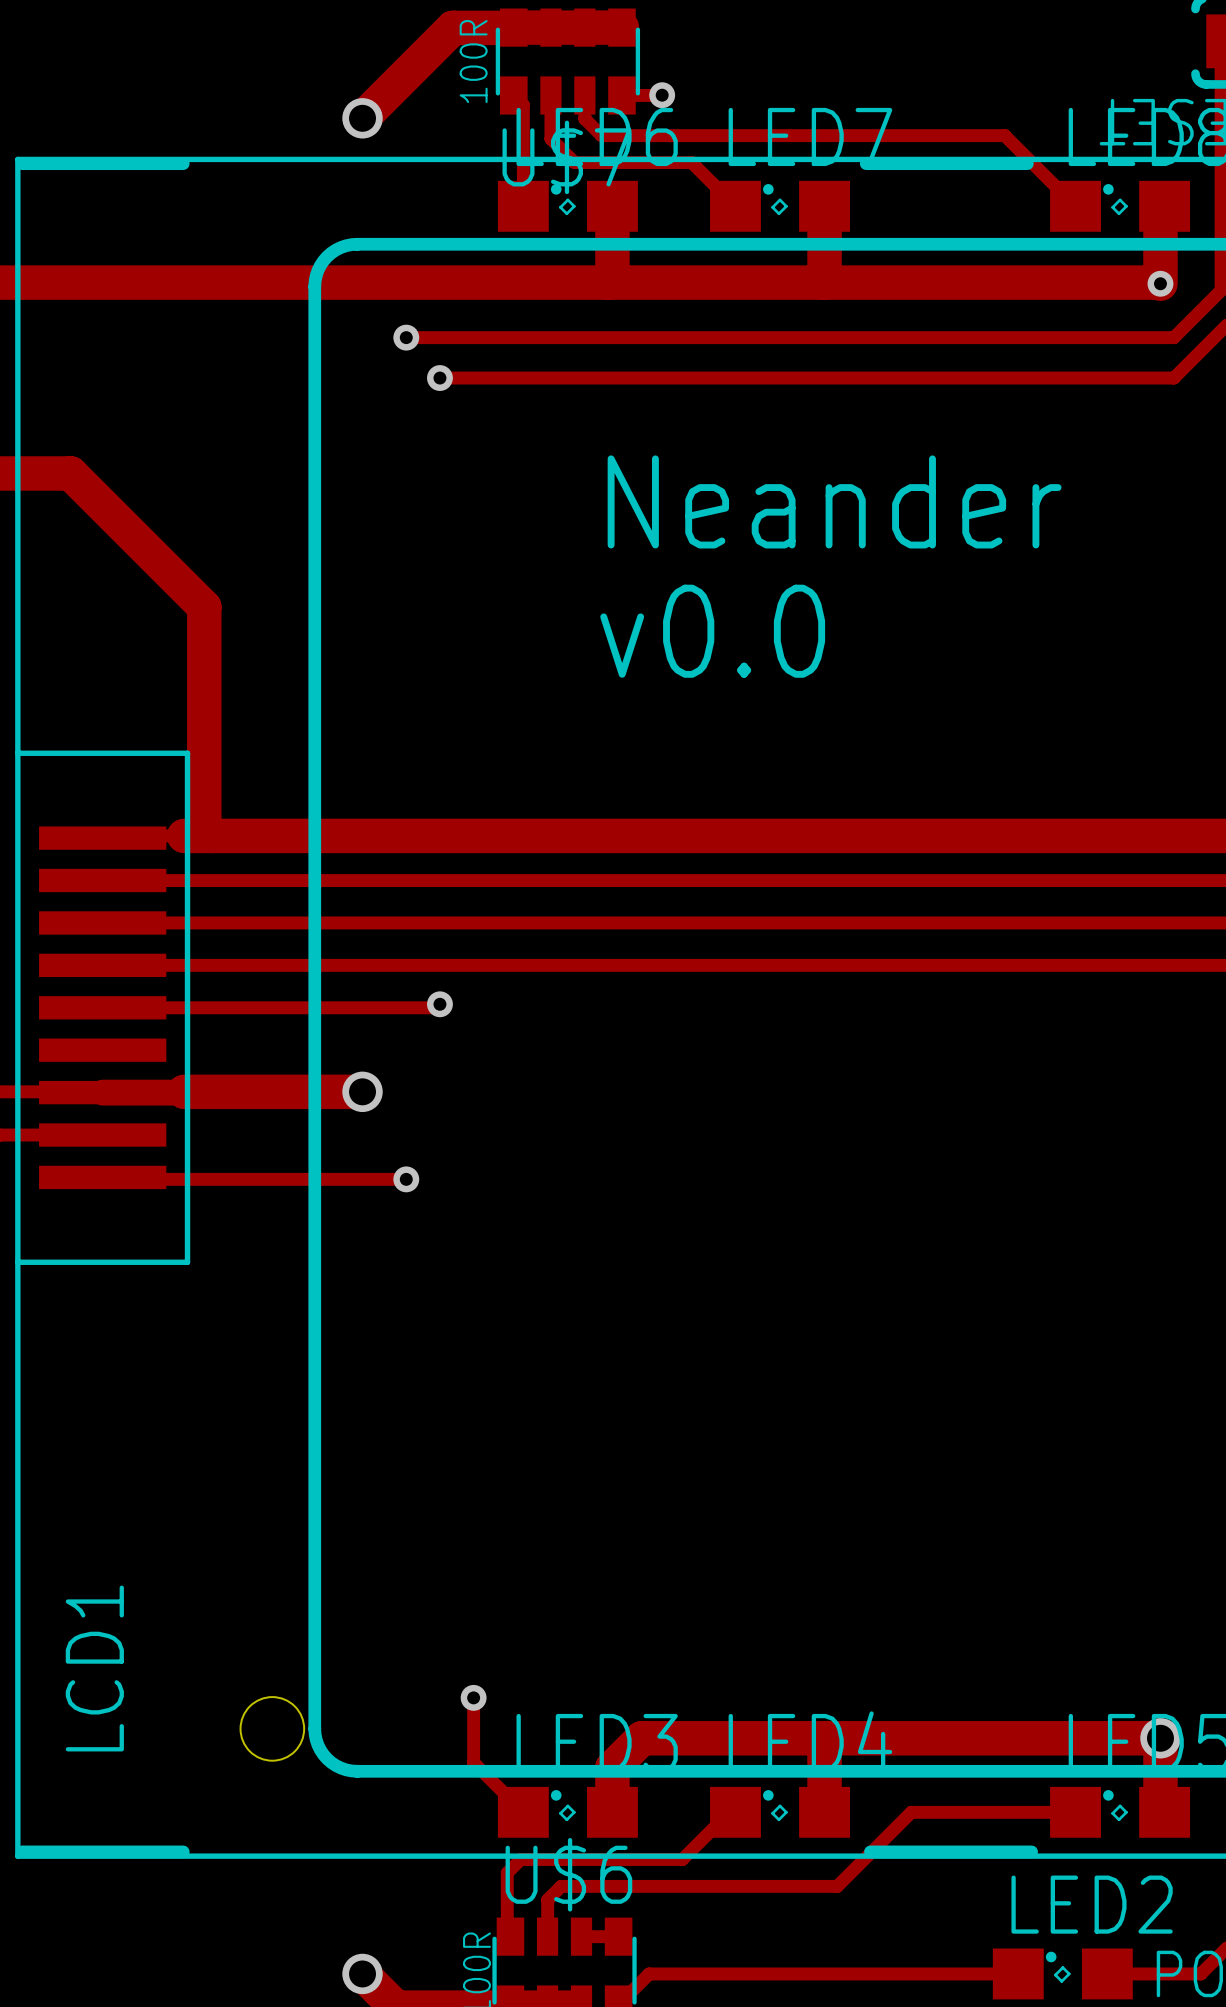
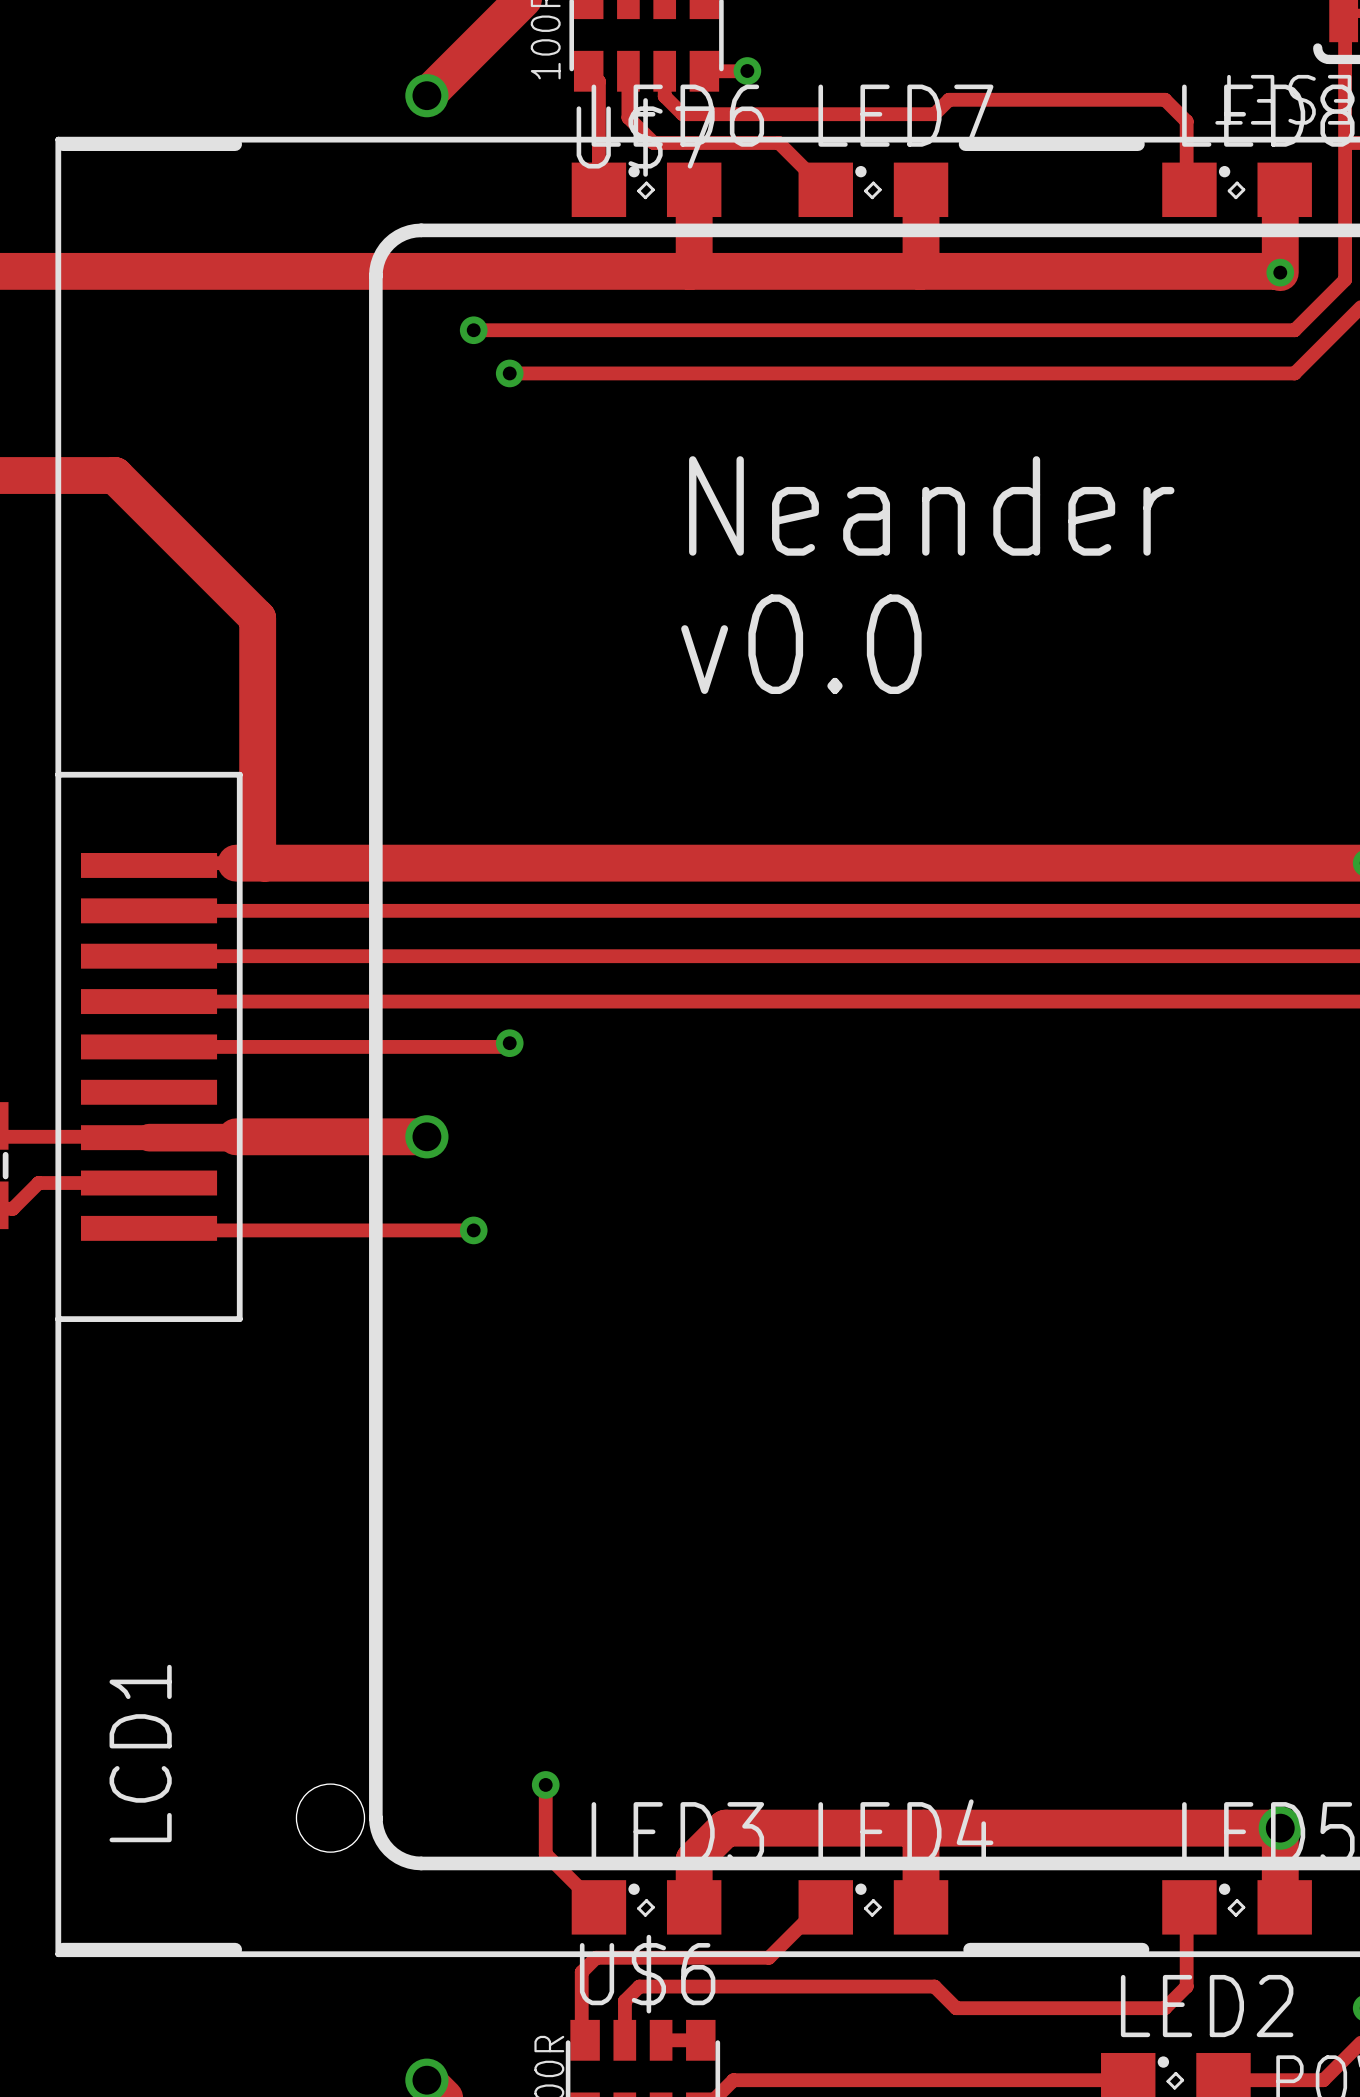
track: (837, 135) (1004, 135) (1072, 203) -> (934, 114) (949, 99) (1165, 99) (1186, 121) (1186, 187)
track: (1075, 1812) (911, 1812) (837, 1886) -> (1189, 1907) (1186, 1910) (1186, 1986) (1165, 2008) (956, 2008) (934, 1986)

